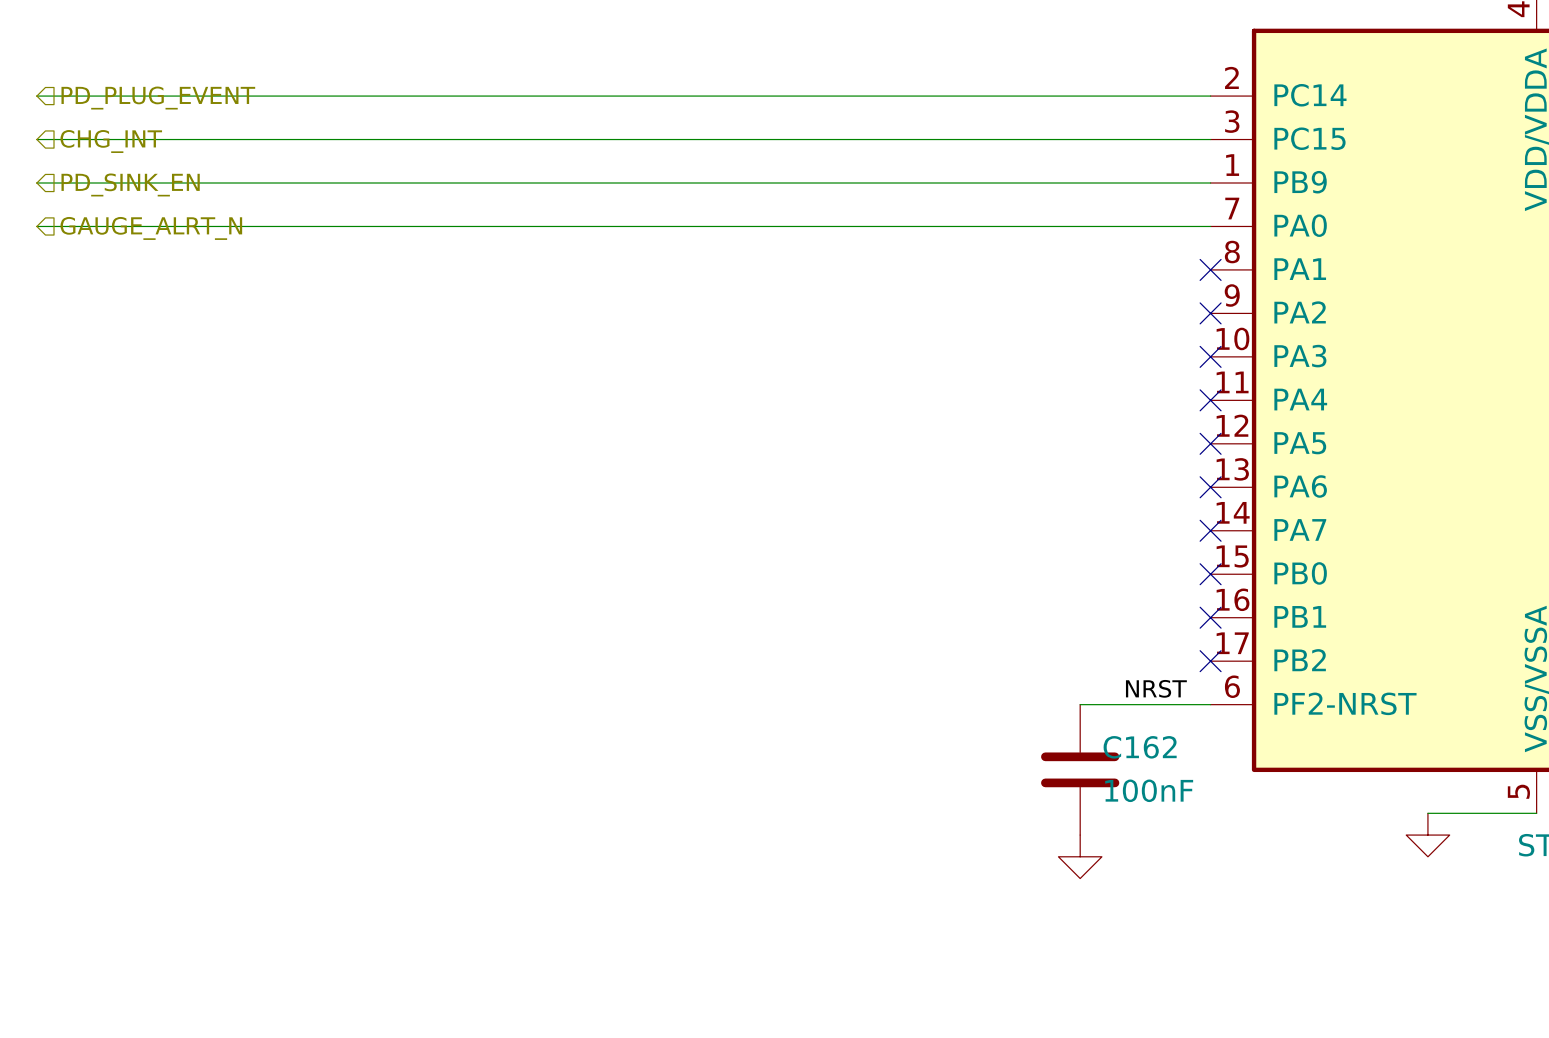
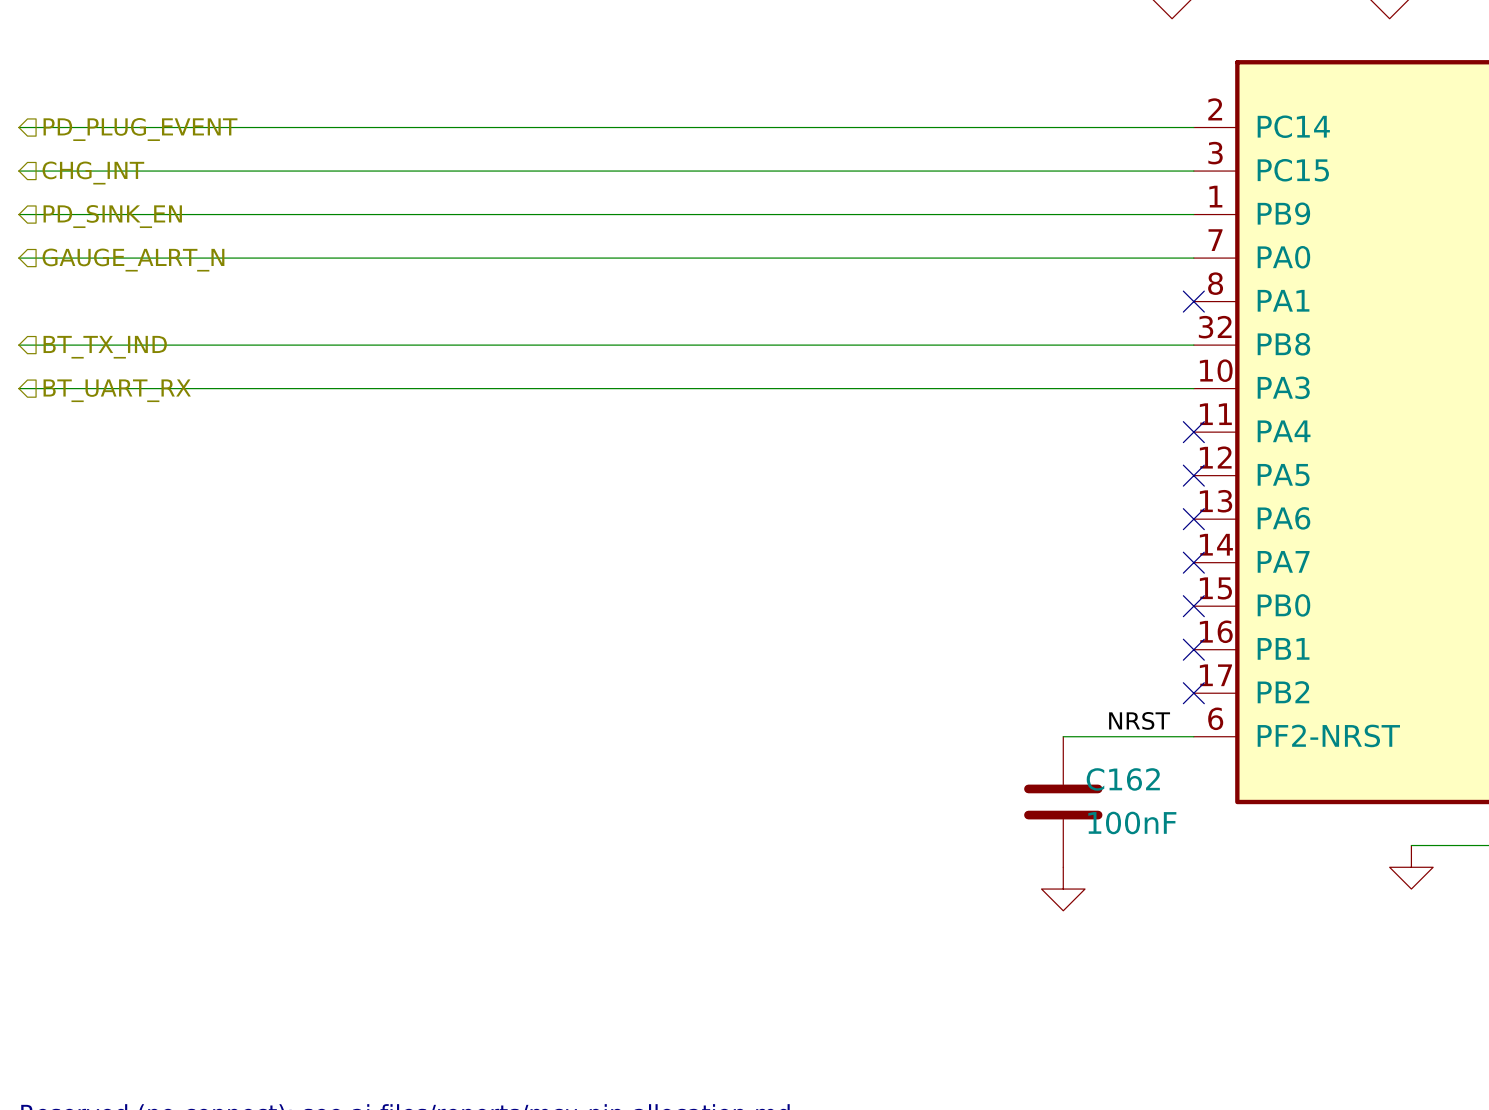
part pin number: 9 (1232, 295) -> 32 (1215, 327)
part pin name: PA2 (1300, 312) -> PB8 (1283, 344)
wire: none -> (18, 345) (1193, 345)
no-connect mark: (1210, 313) -> none
hierarchical label: none -> BT_TX_IND (105, 347)
wire: none -> (18, 388) (1193, 388)
no-connect mark: (1210, 356) -> none
hierarchical label: none -> BT_UART_RX (117, 390)

